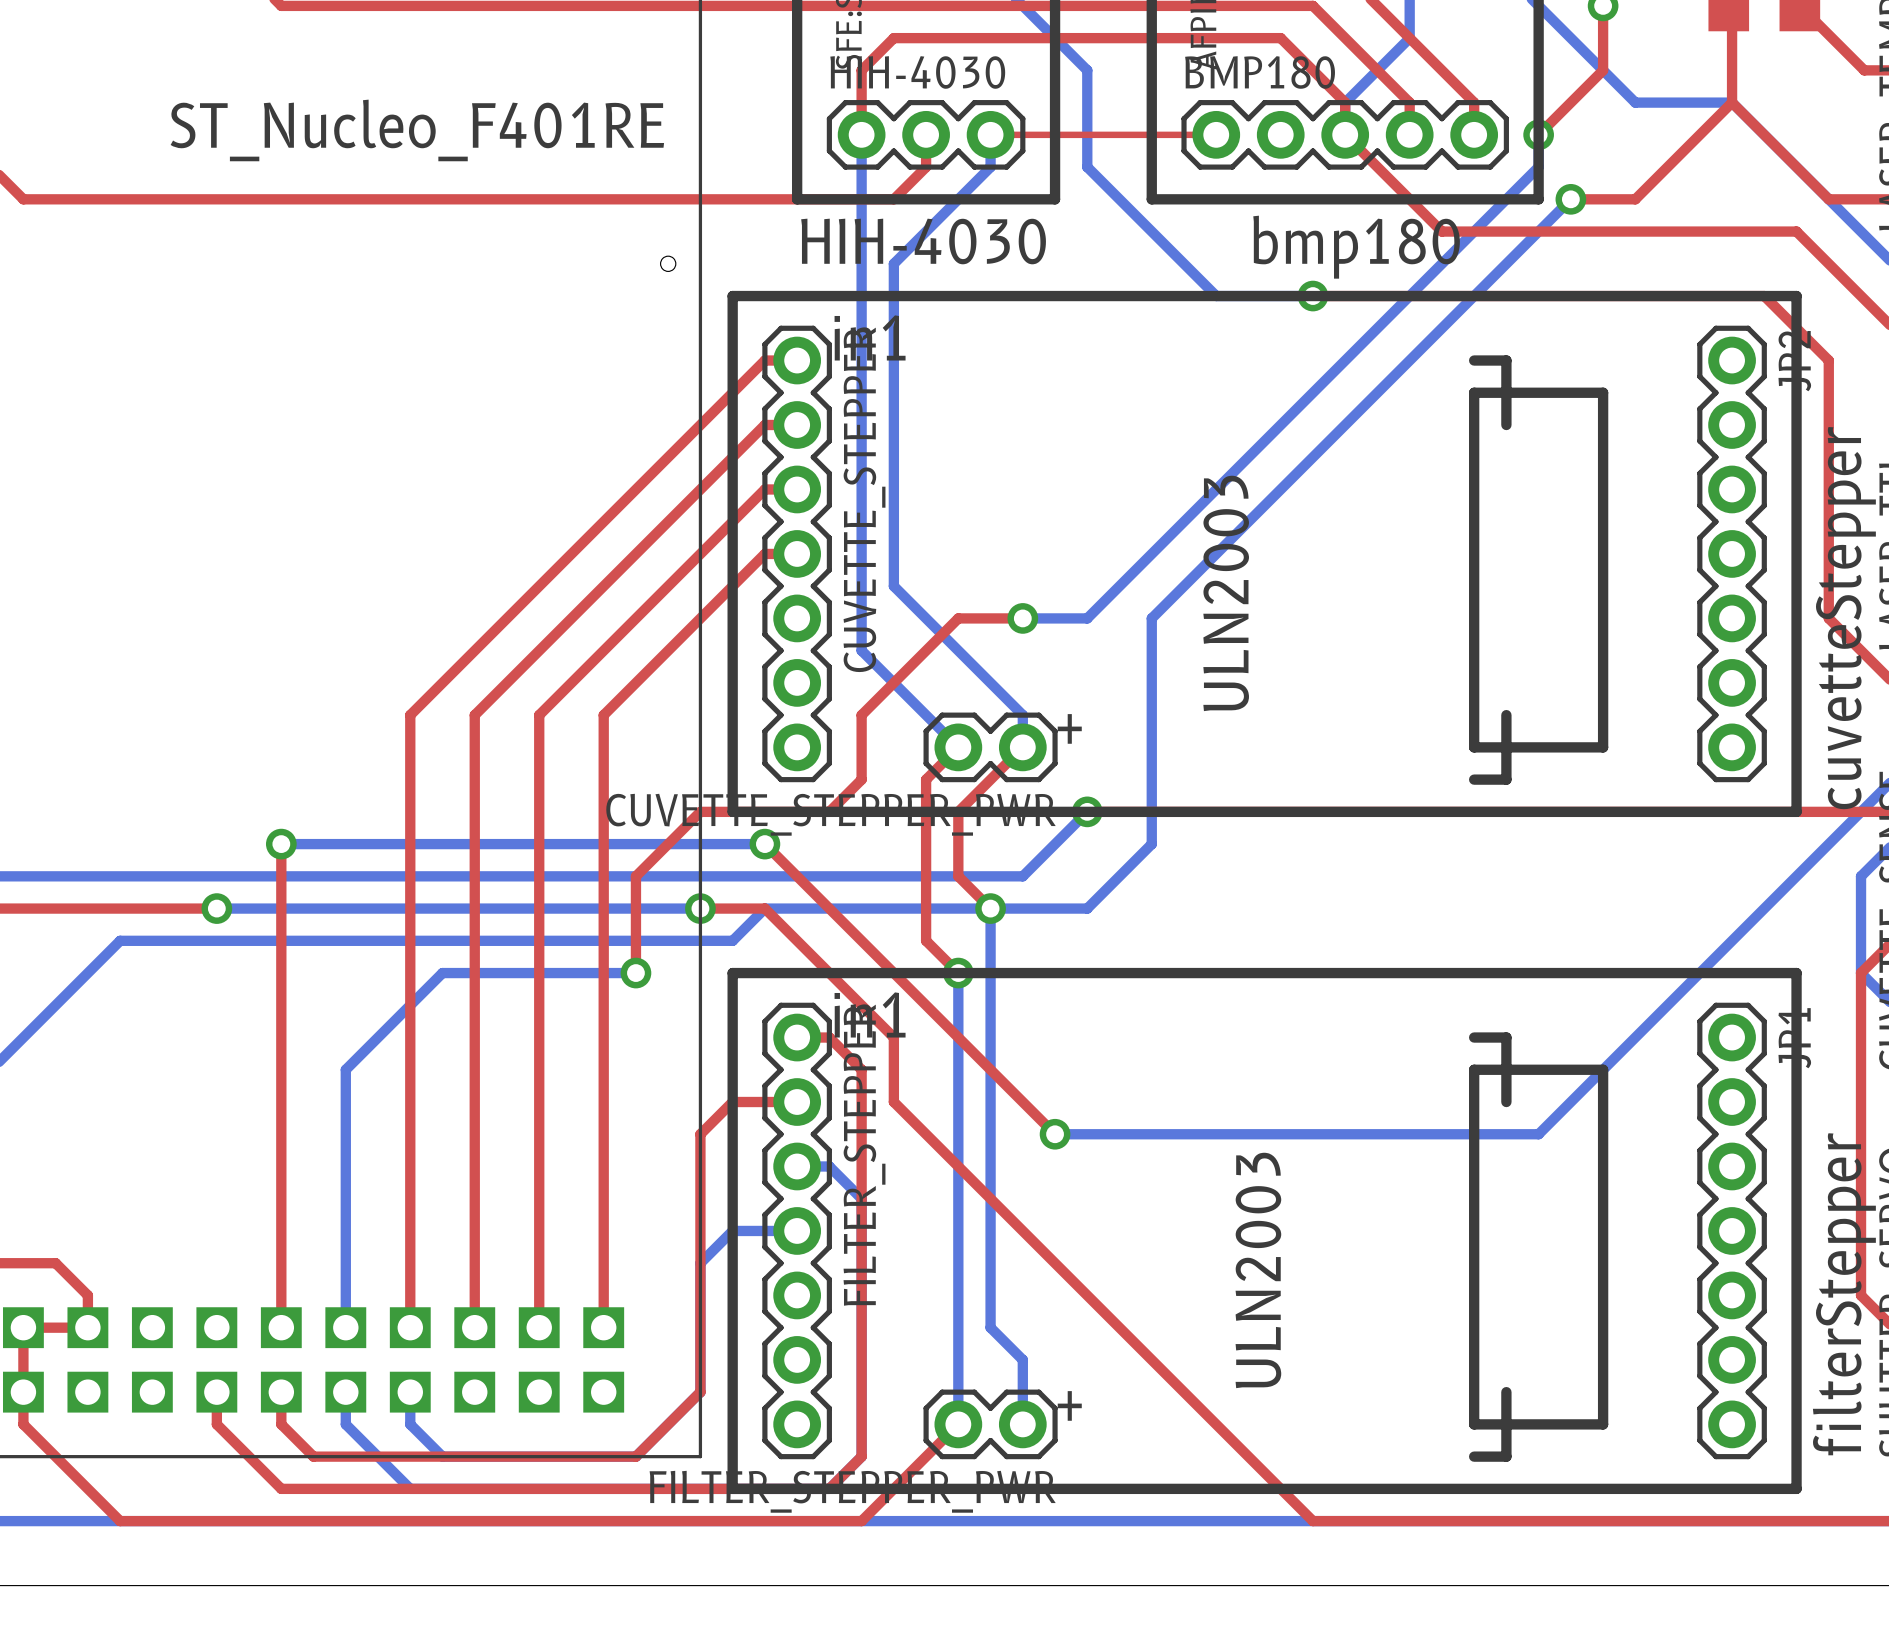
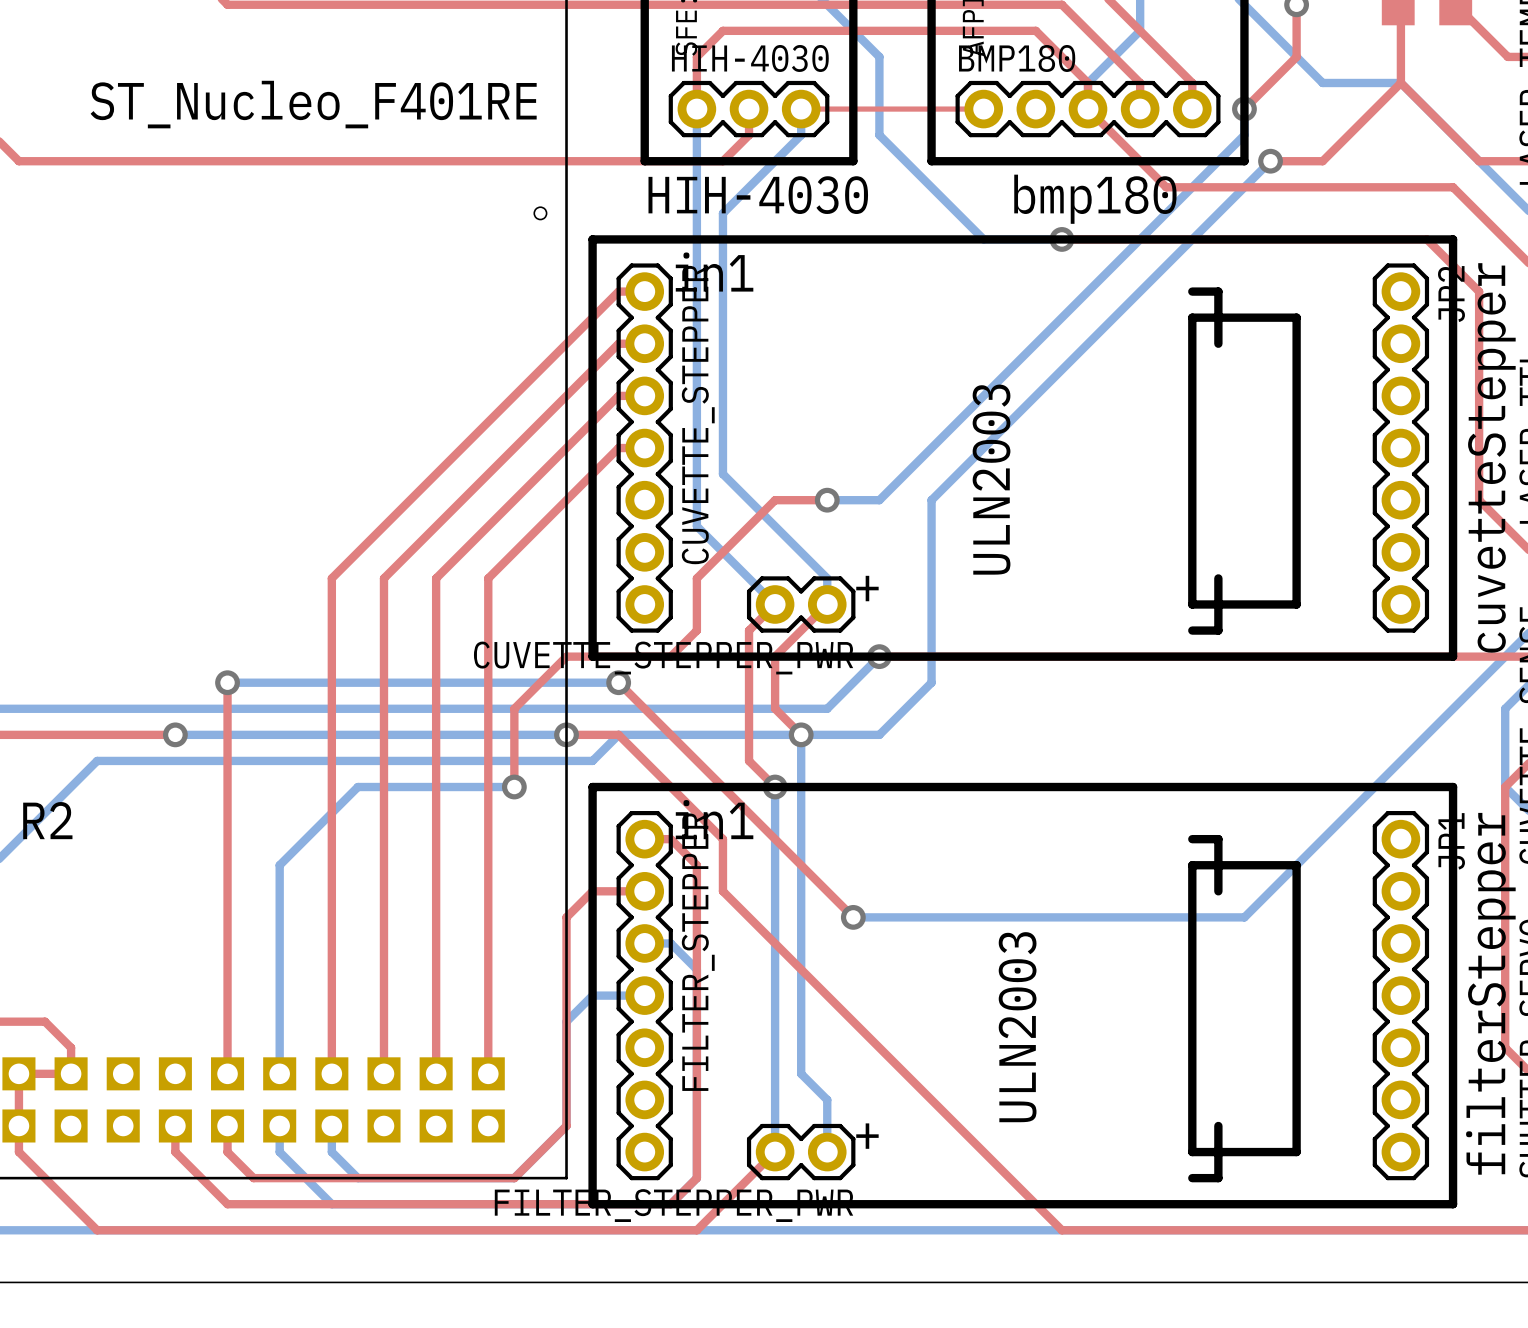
text: none -> R2 (47, 820)

